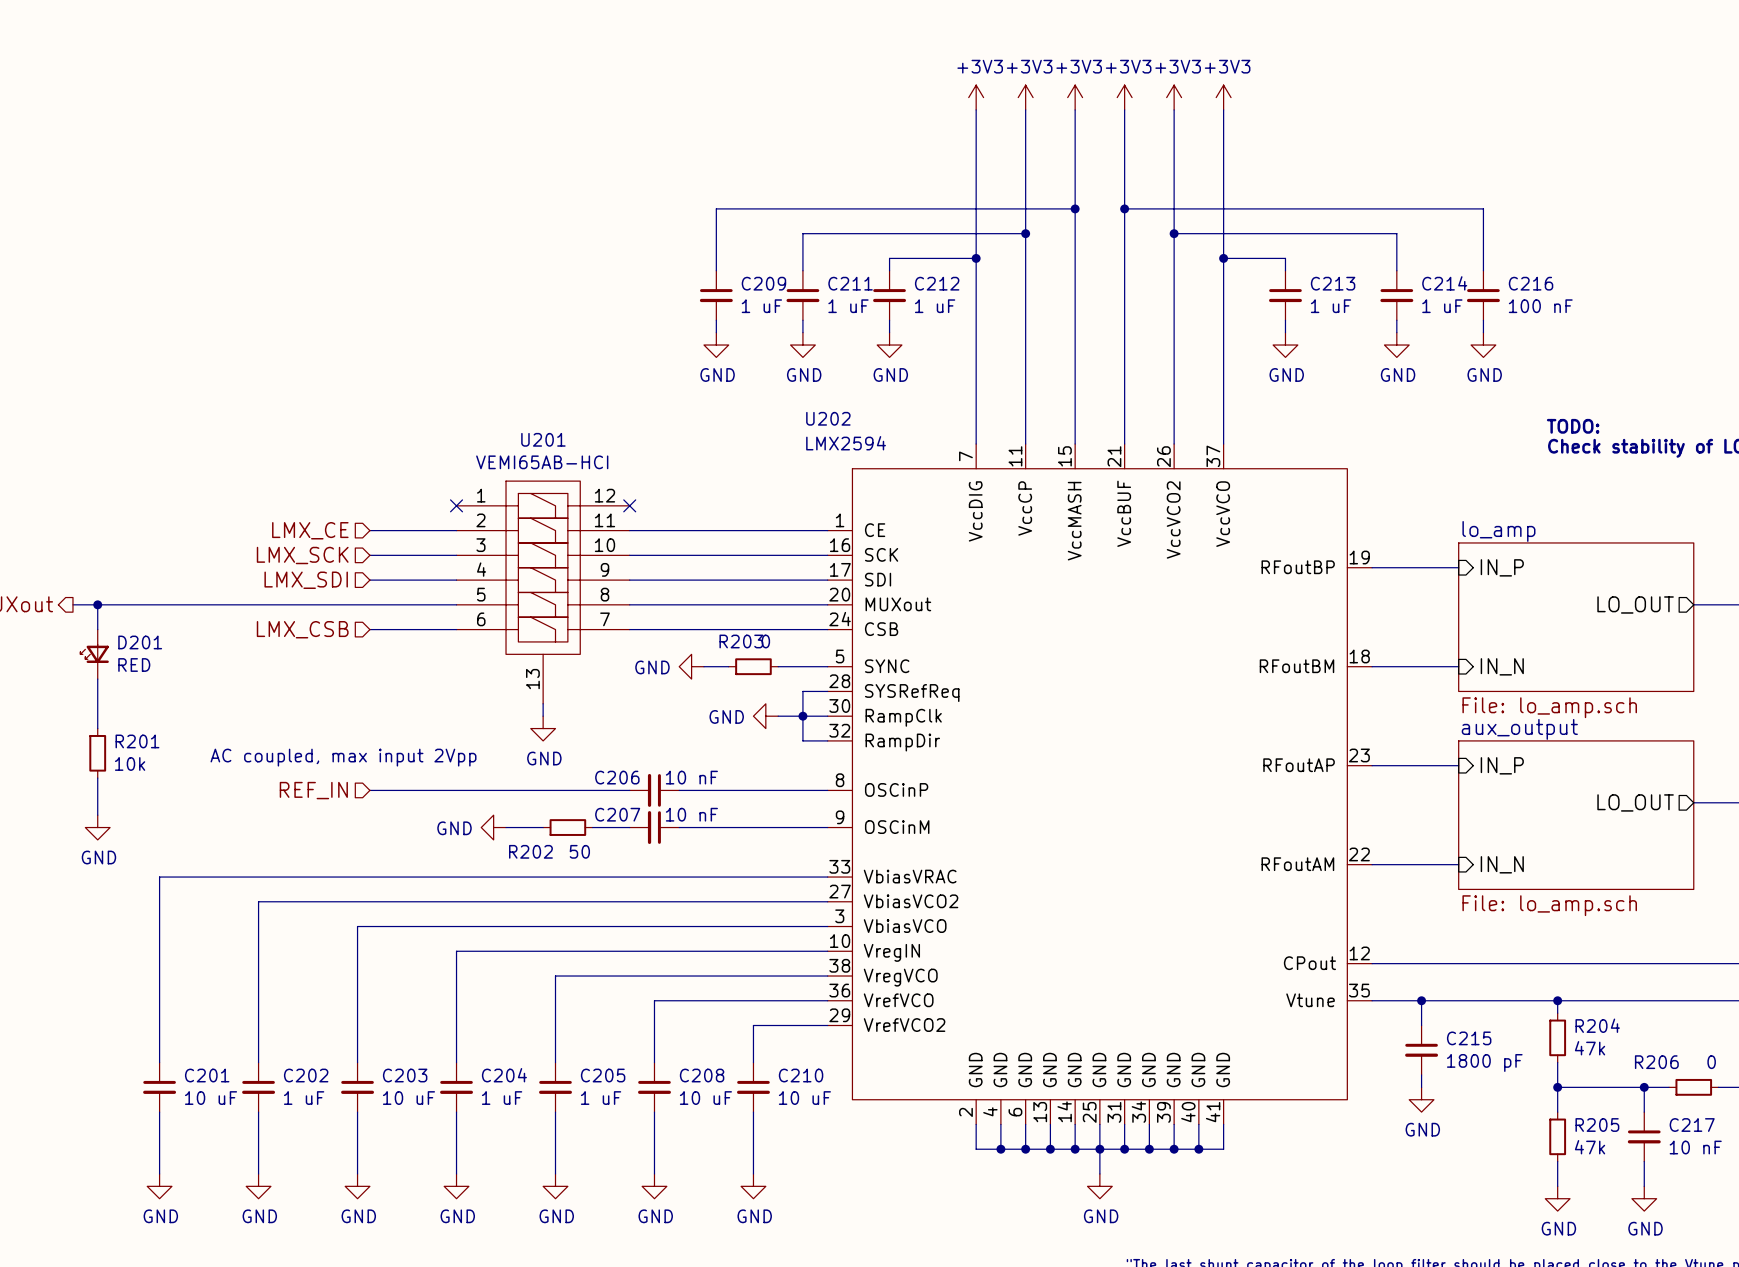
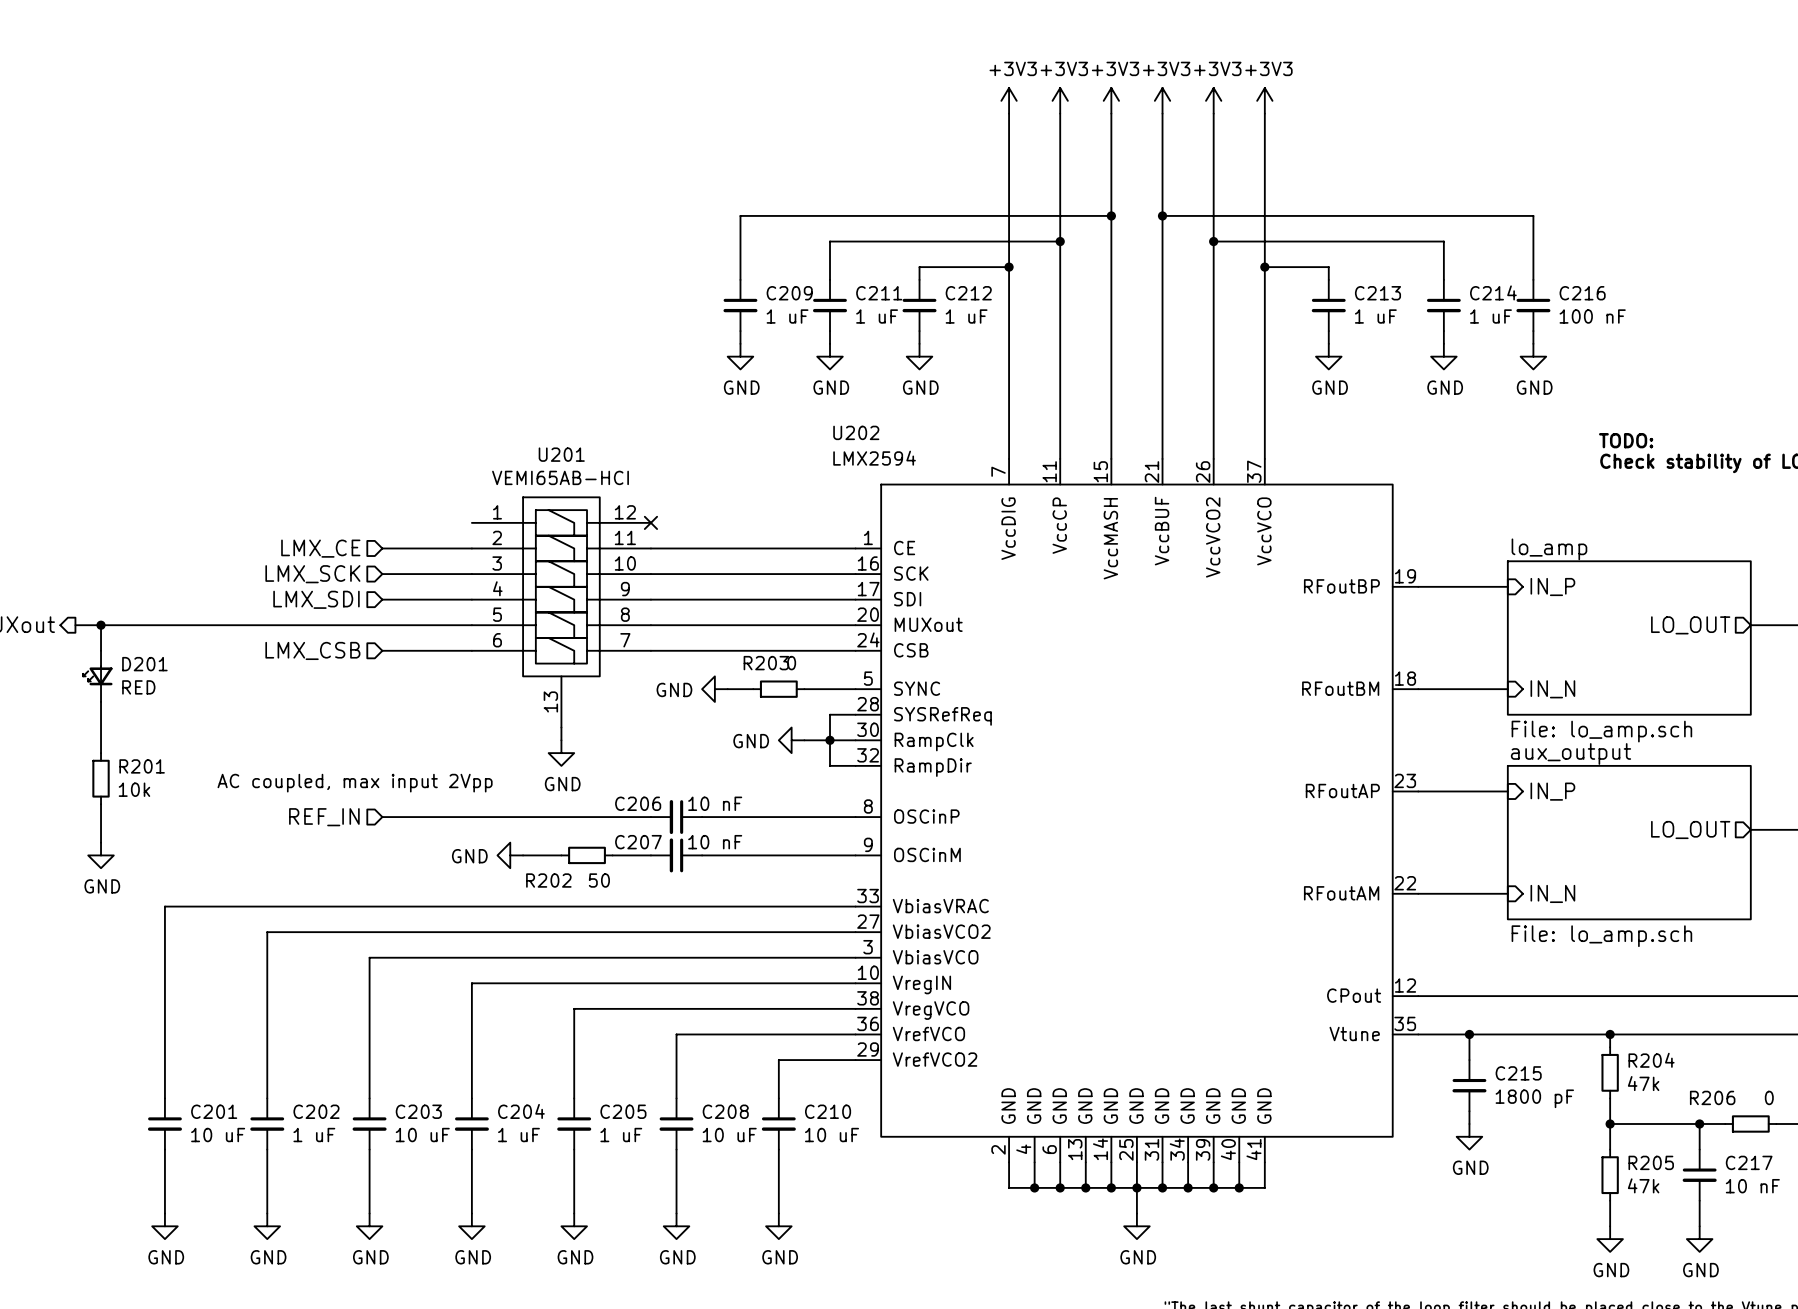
no-connect mark: (456, 505) -> none

